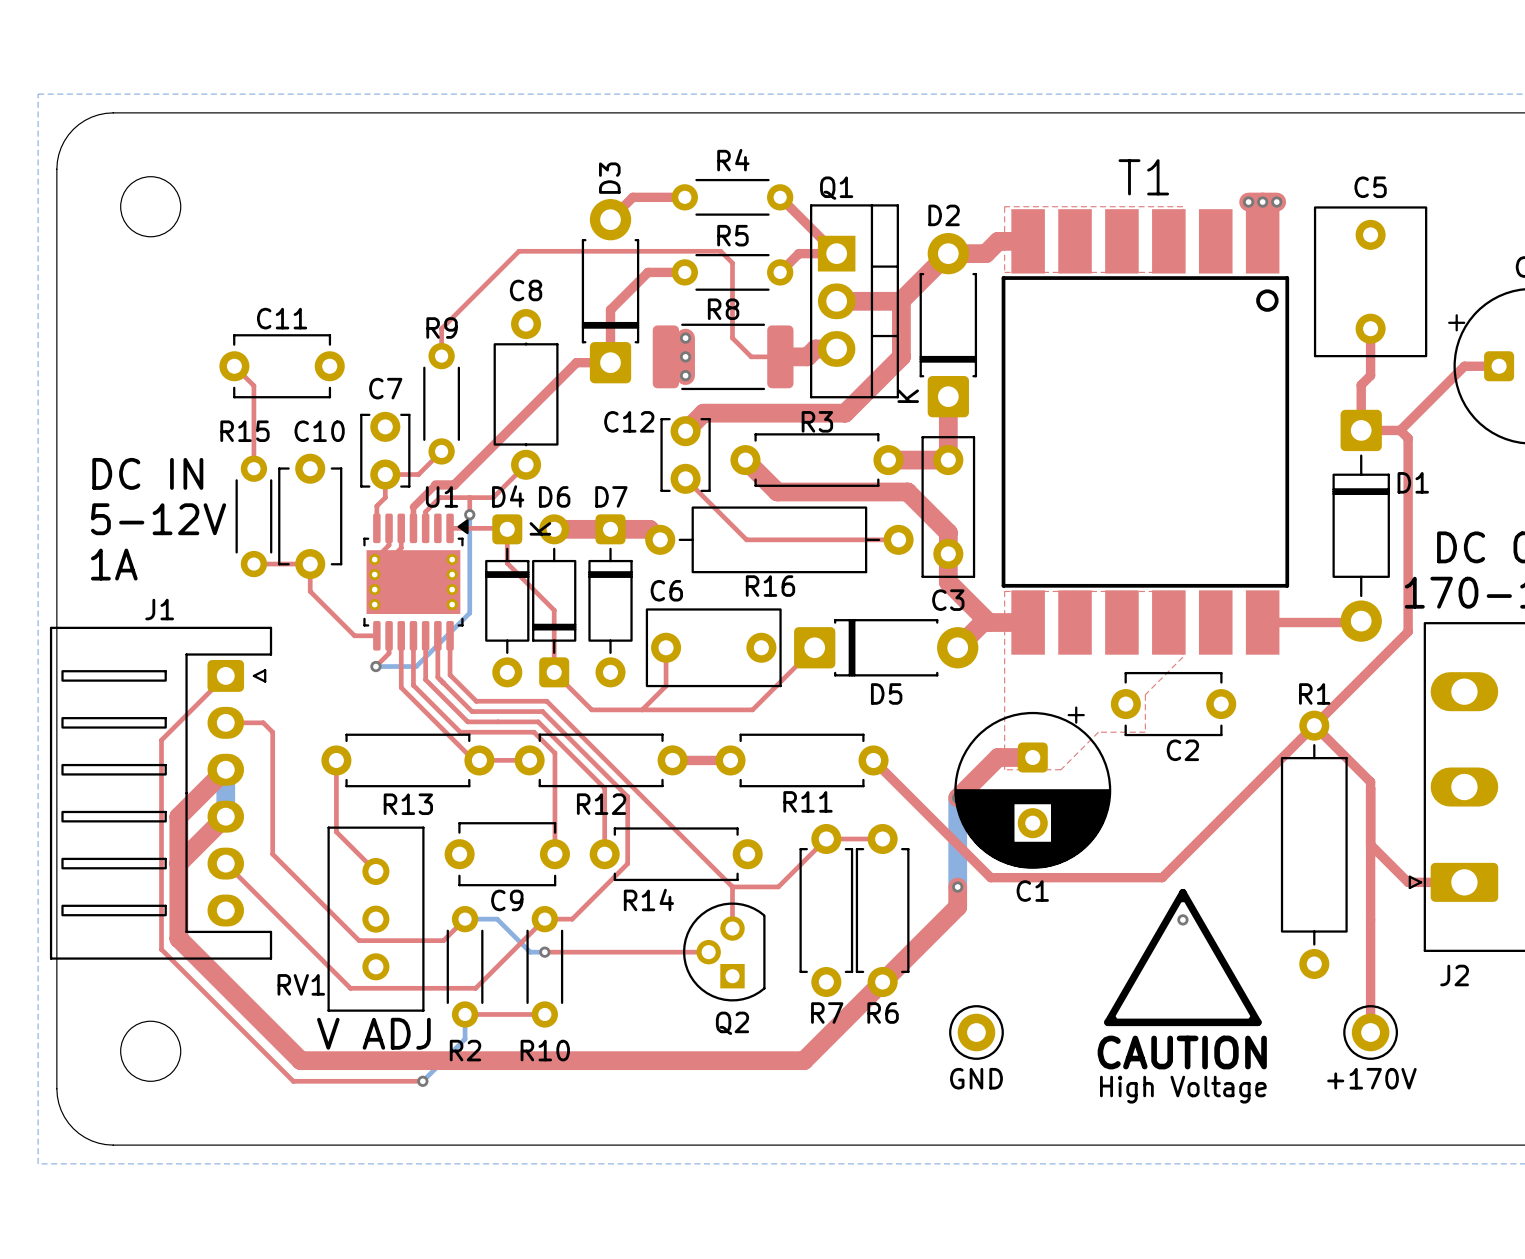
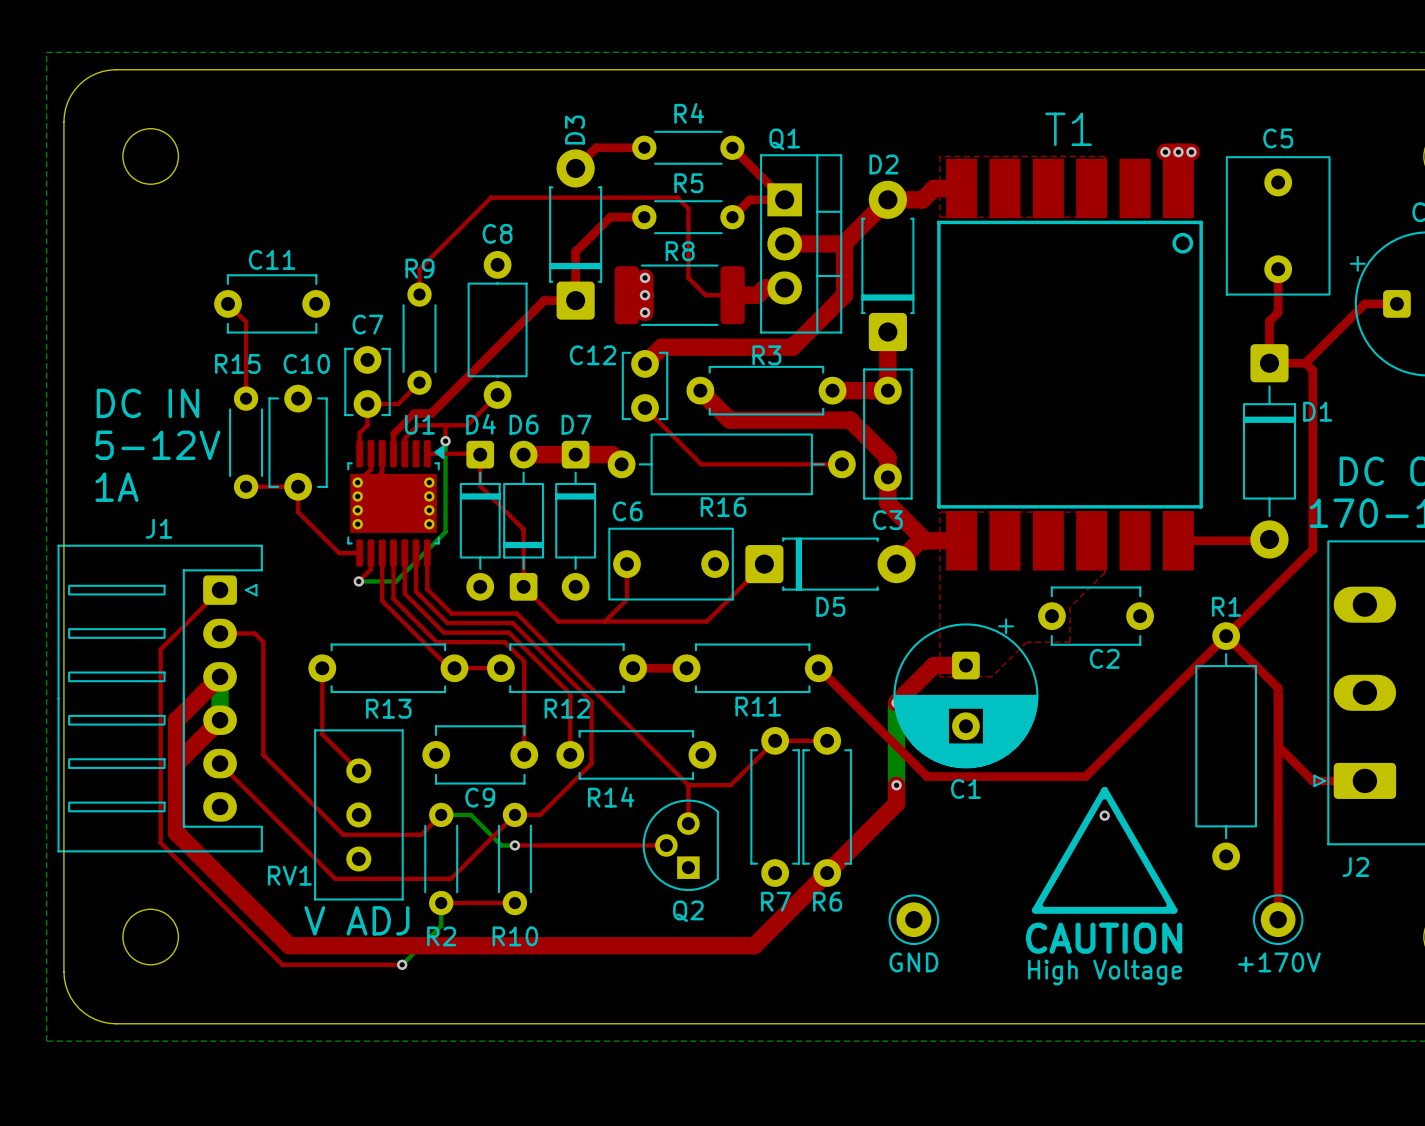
D2 text: K (908, 396) -> none
D4 text: K (540, 528) -> none

